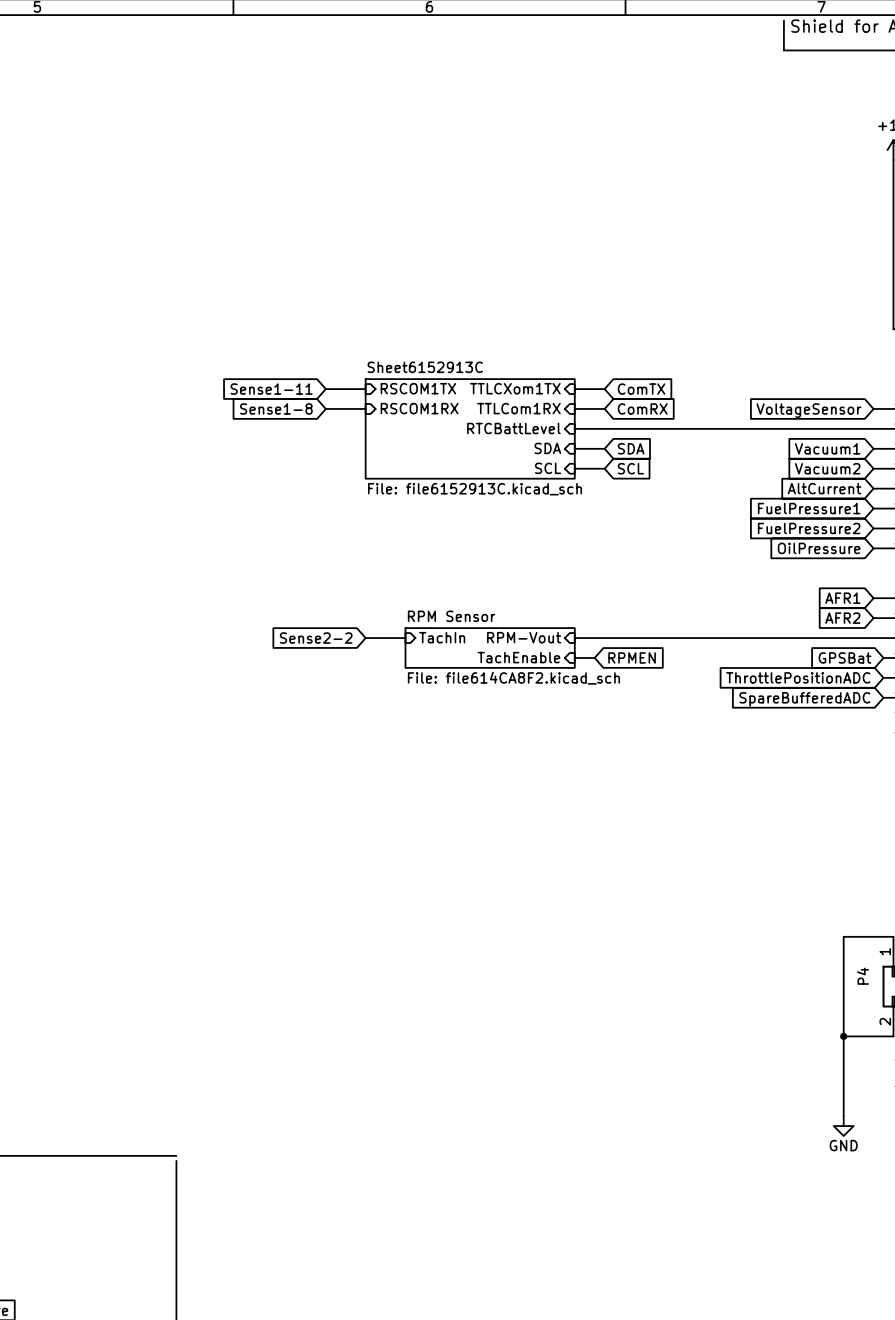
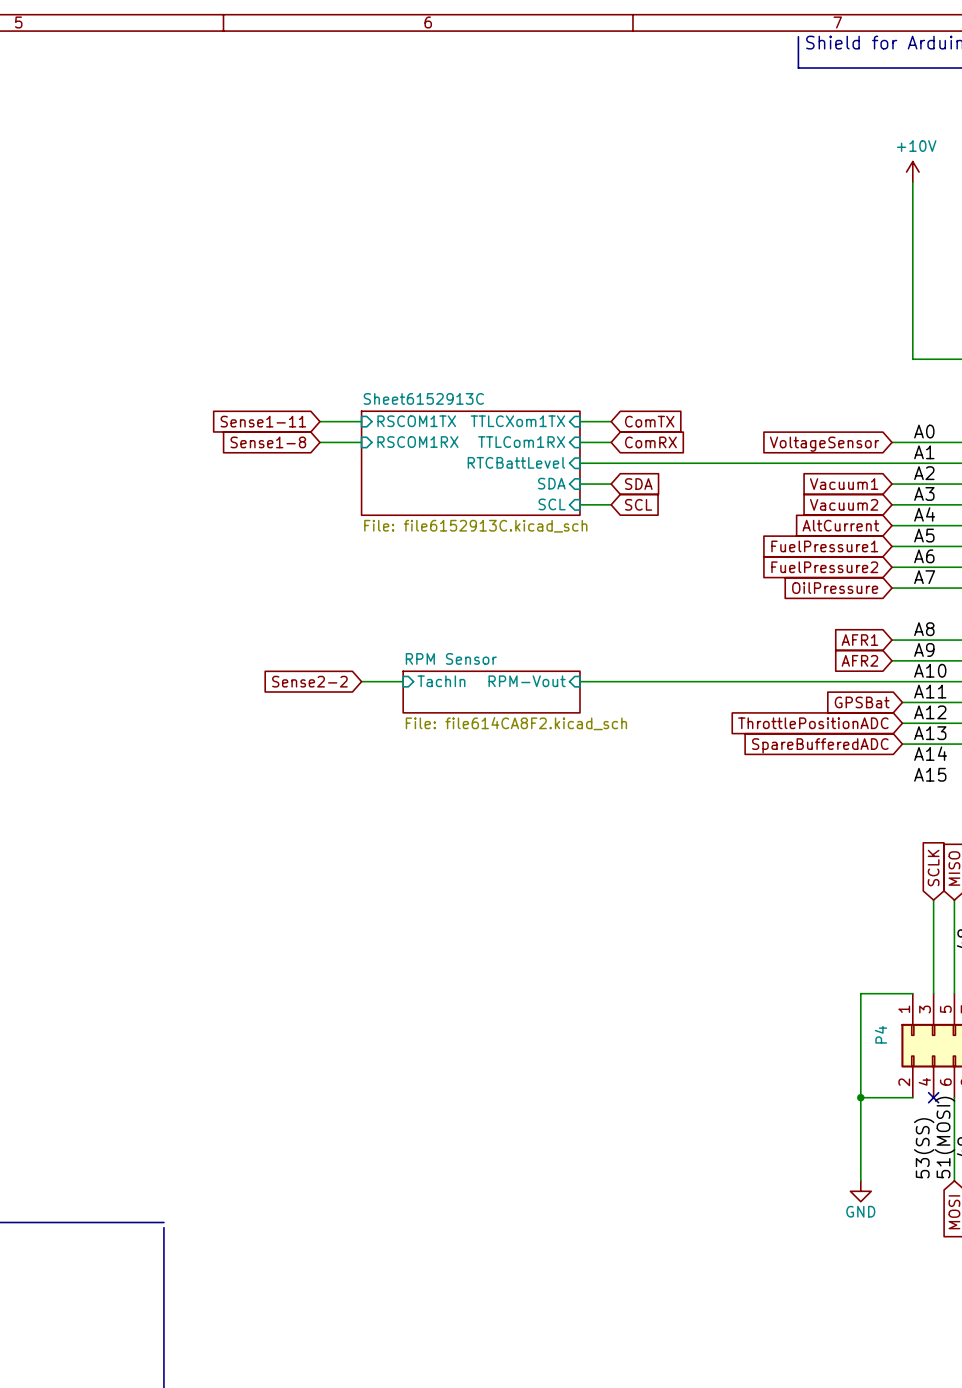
sheet pin: TachEnable (518, 657) -> none
wire: (574, 657) (594, 657) -> none
global label: RPMEN (632, 657) -> none

